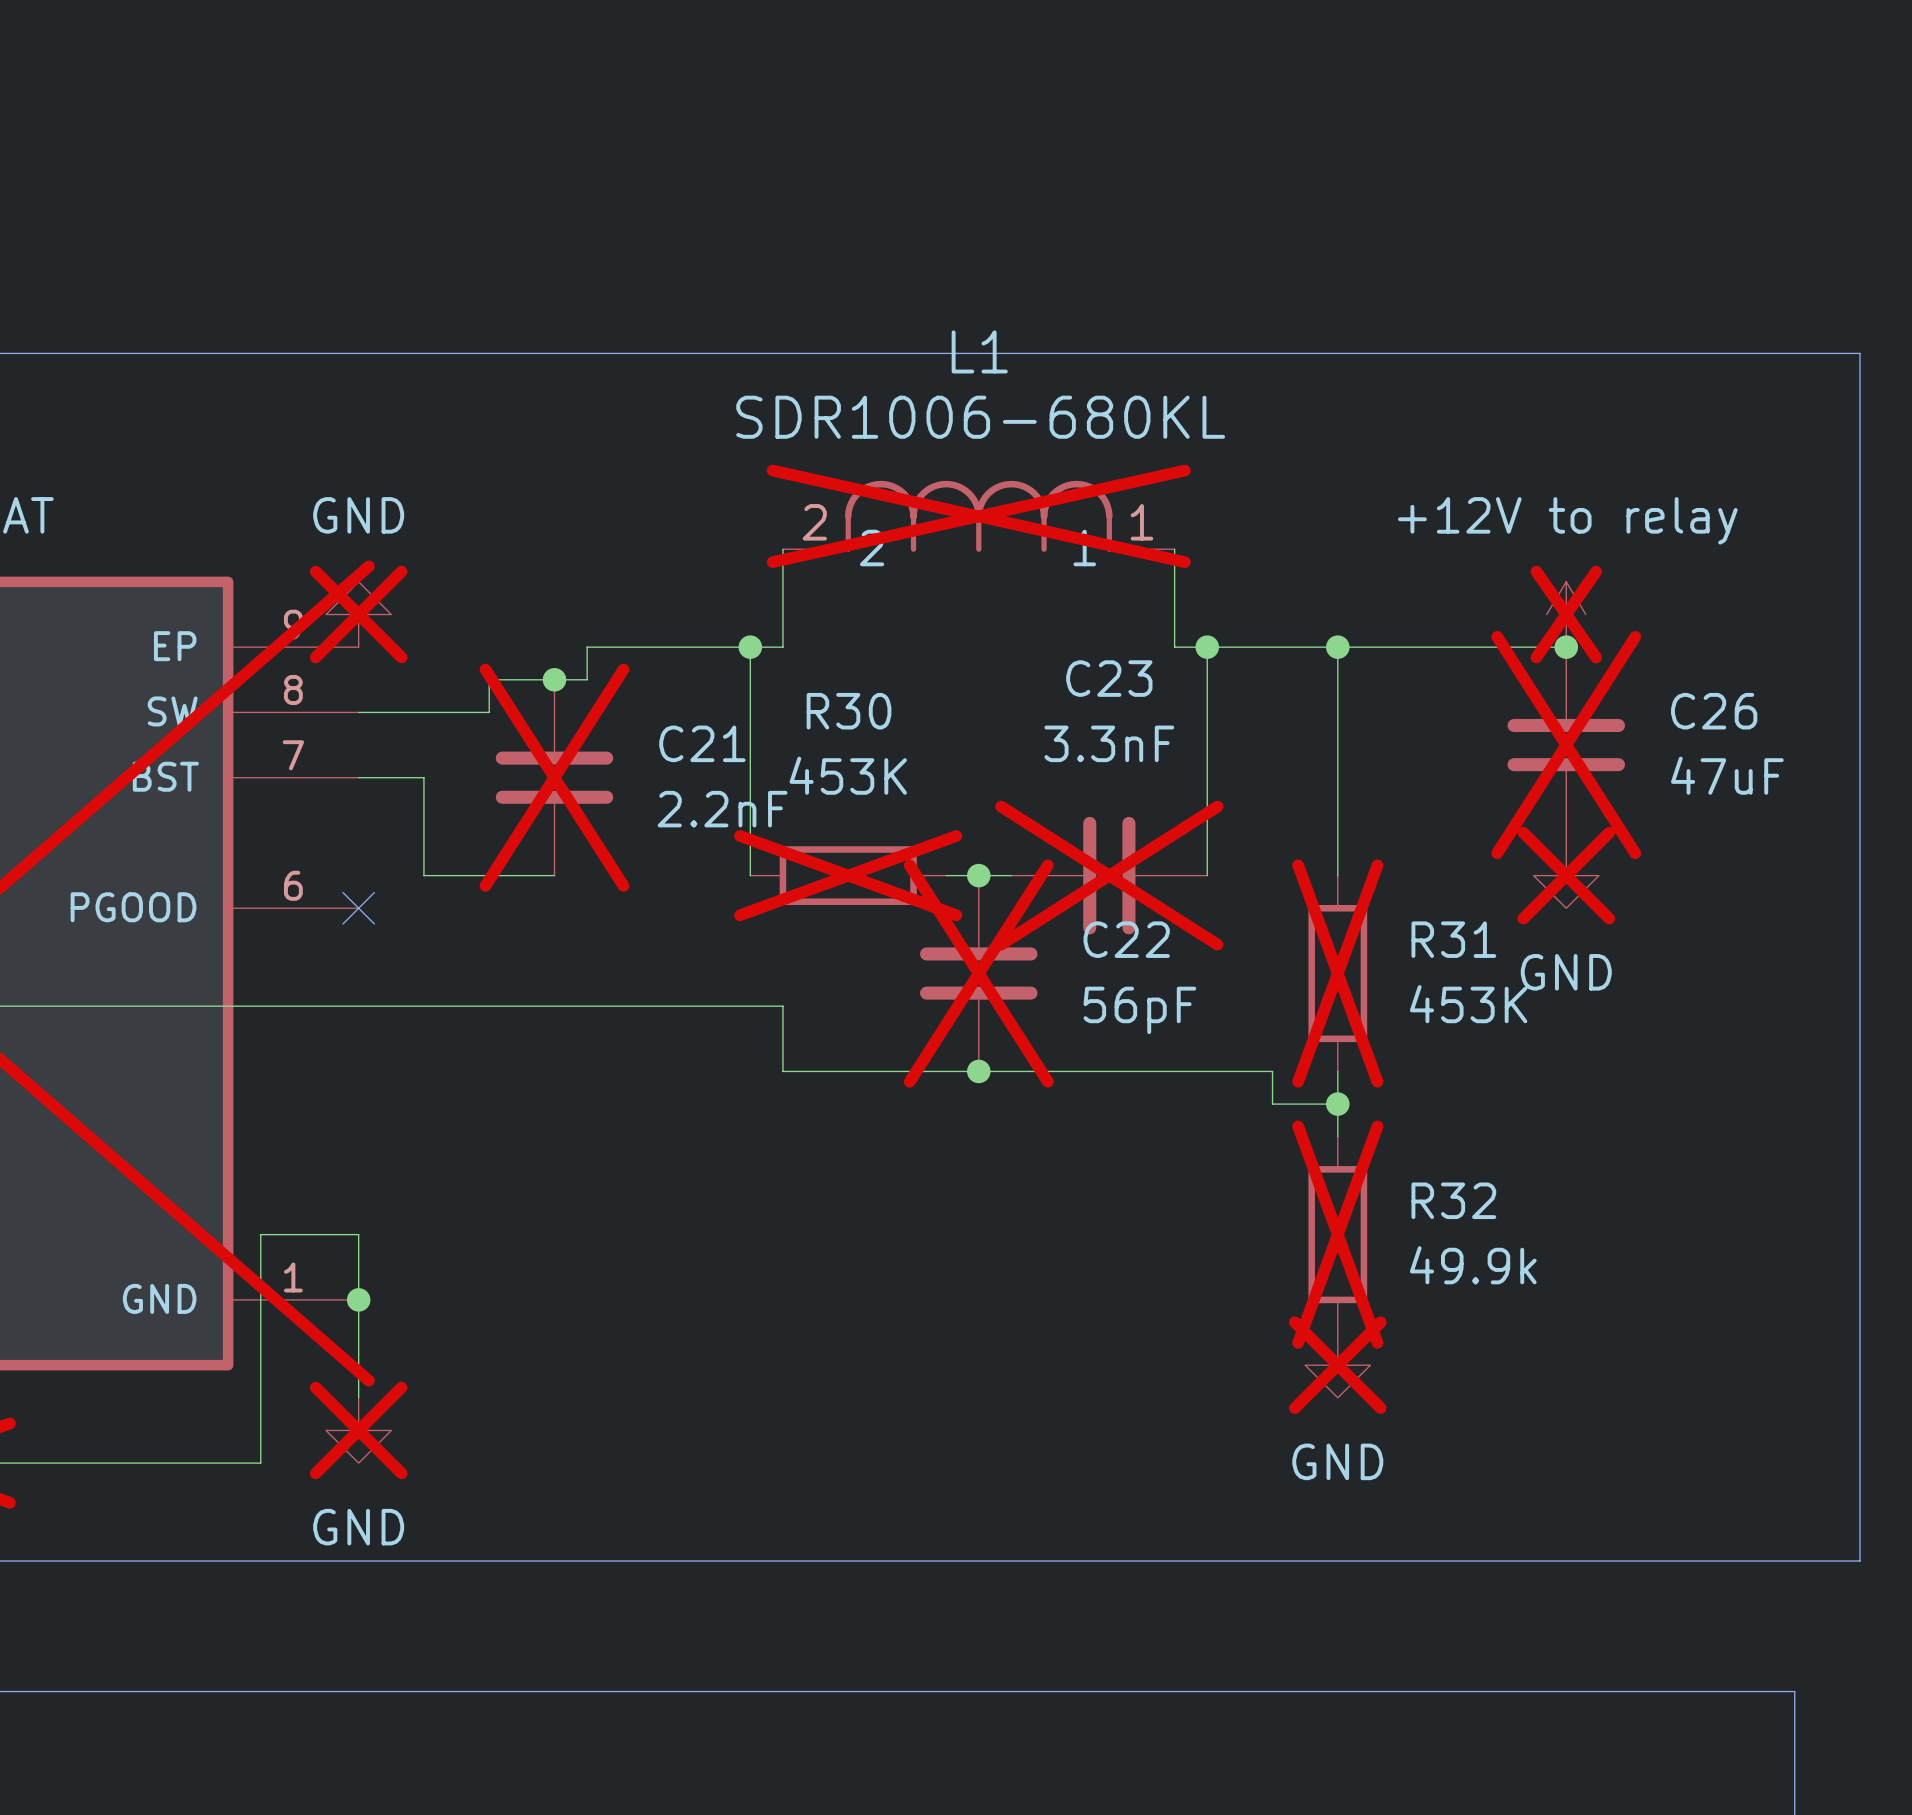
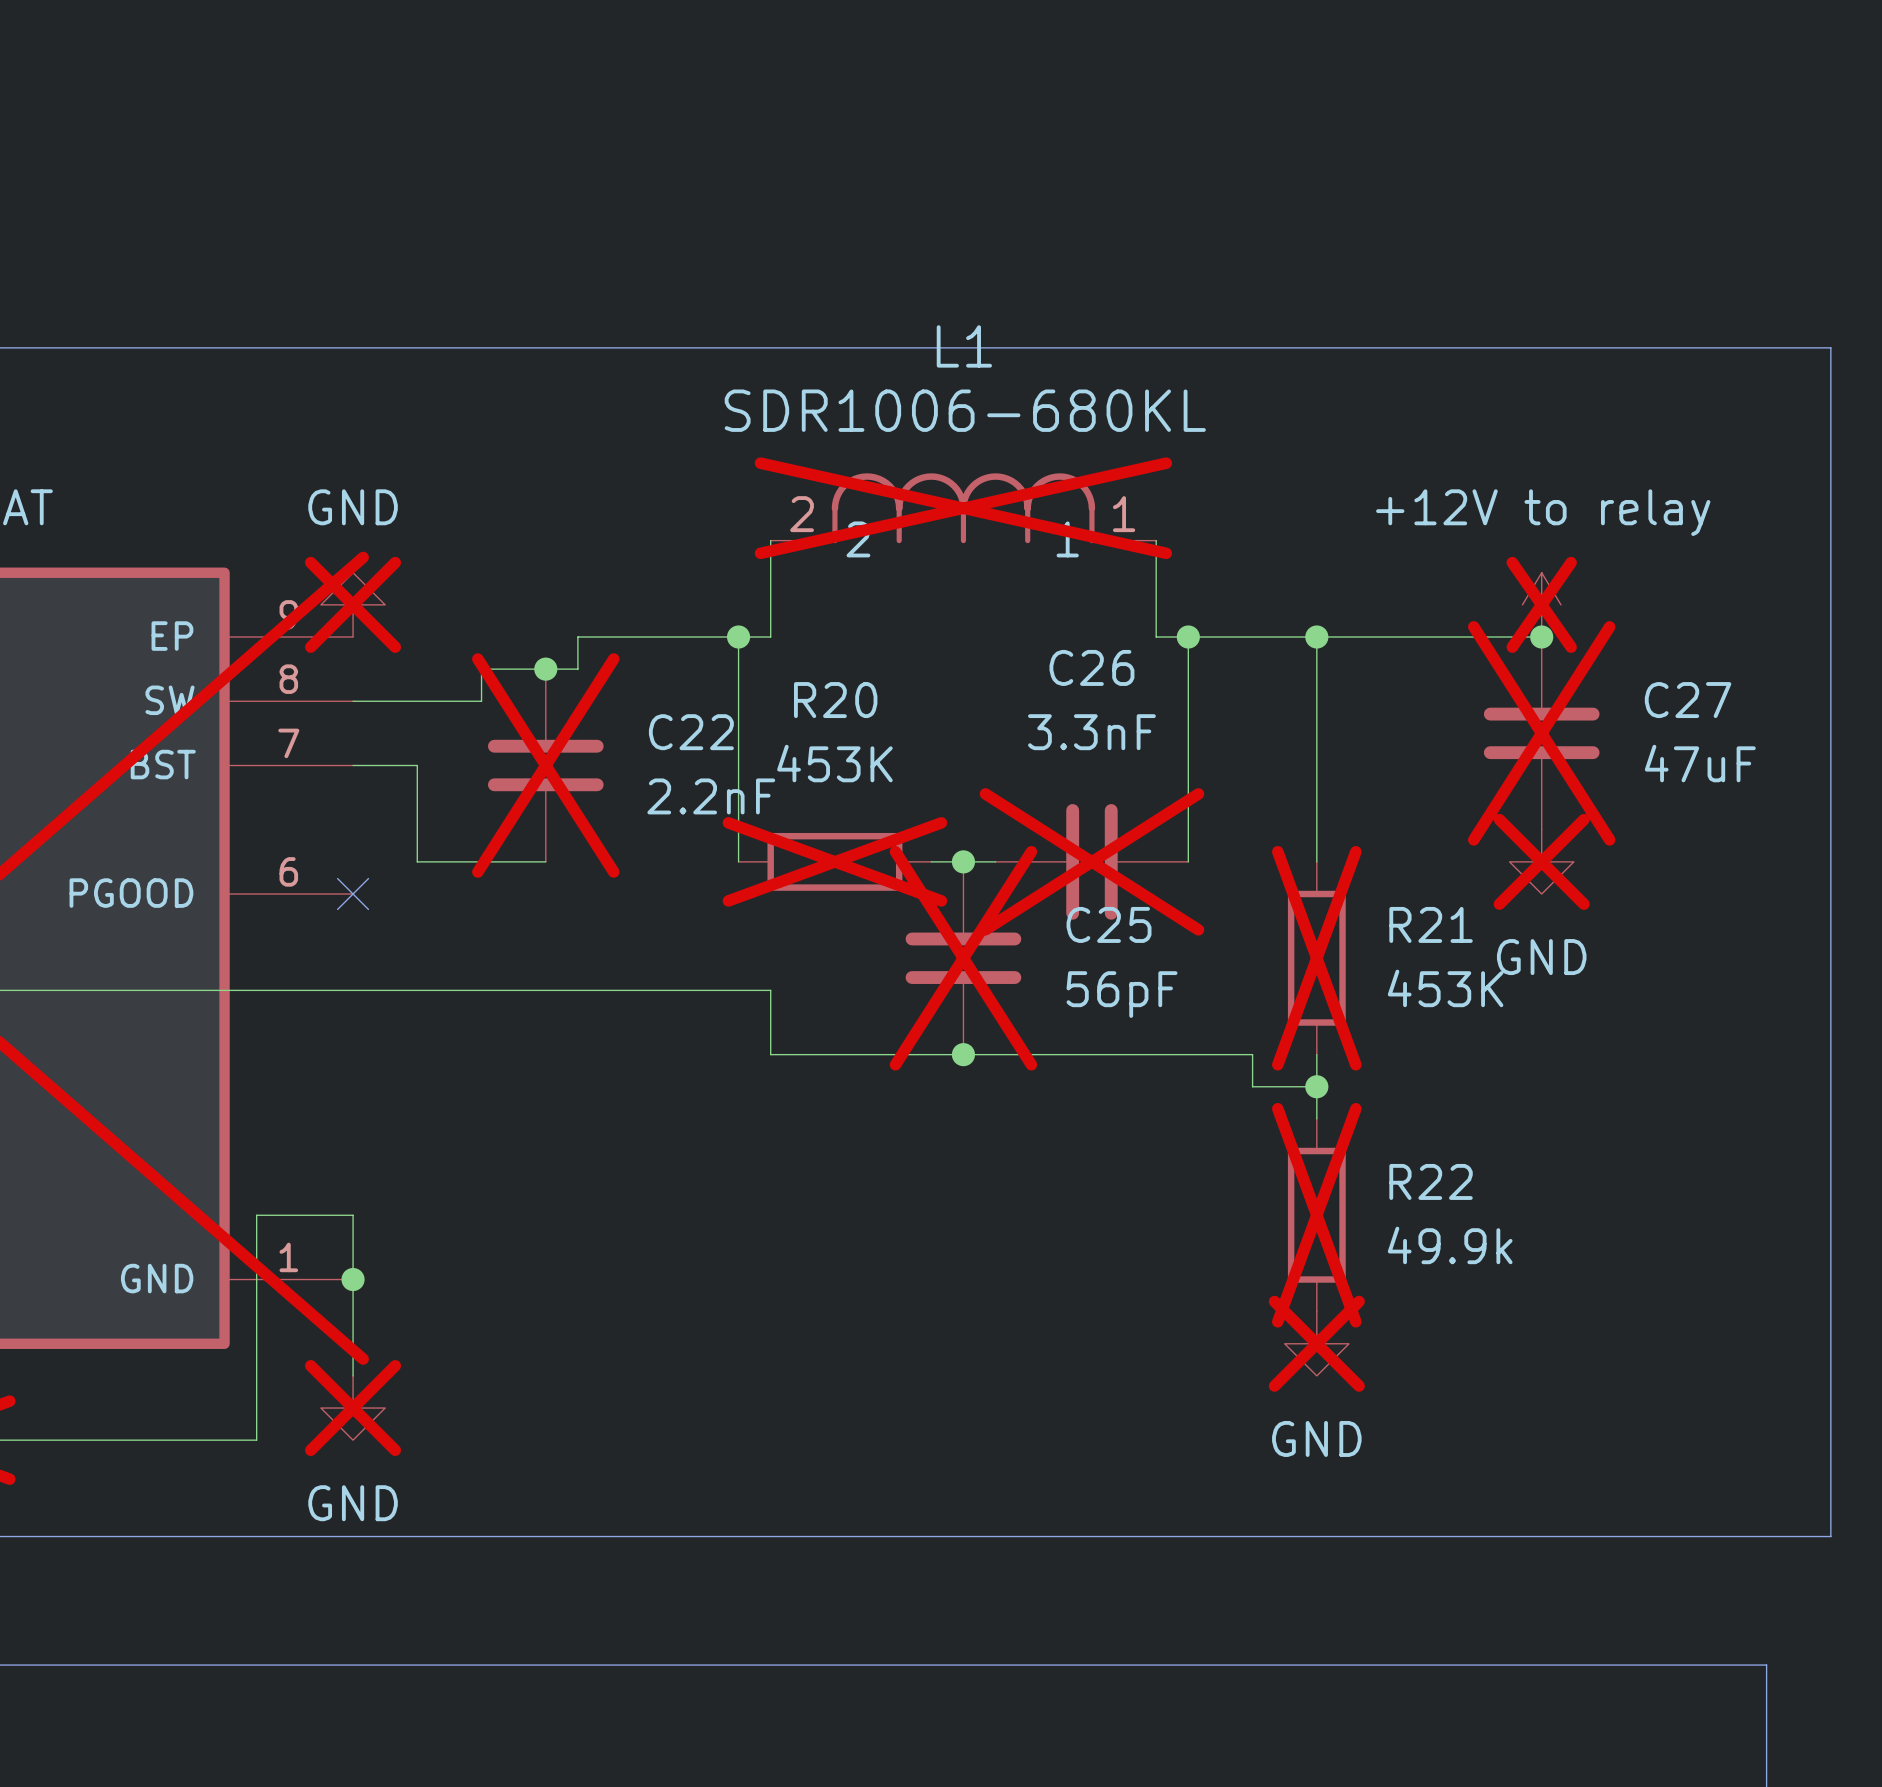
C23 name: C23 (1109, 678) -> C26 (1091, 667)
R30 name: R30 (849, 711) -> R20 (835, 700)
C26 name: C26 (1714, 711) -> C27 (1688, 700)
C21 name: C21 (702, 743) -> C22 (691, 732)
C22 name: C22 (1126, 939) -> C25 (1109, 924)
R31 name: R31 (1453, 939) -> R21 (1431, 924)
R32 name: R32 (1453, 1200) -> R22 (1431, 1181)

